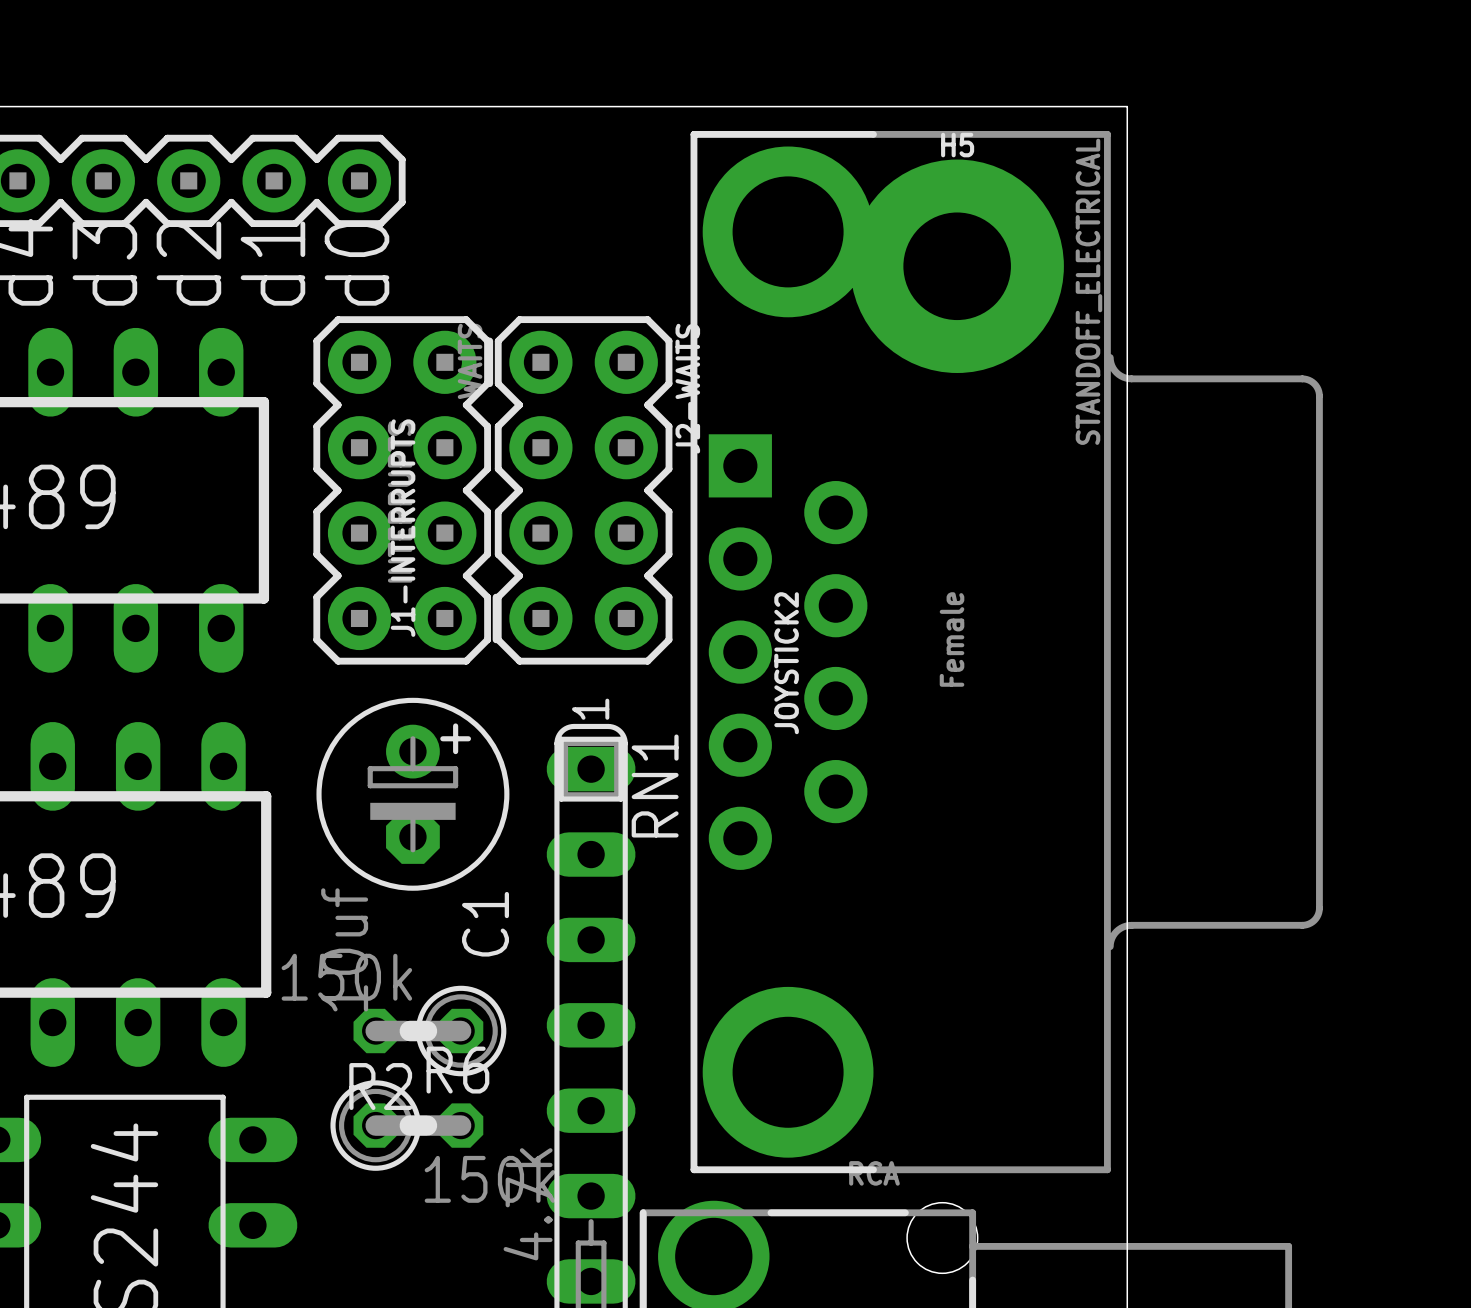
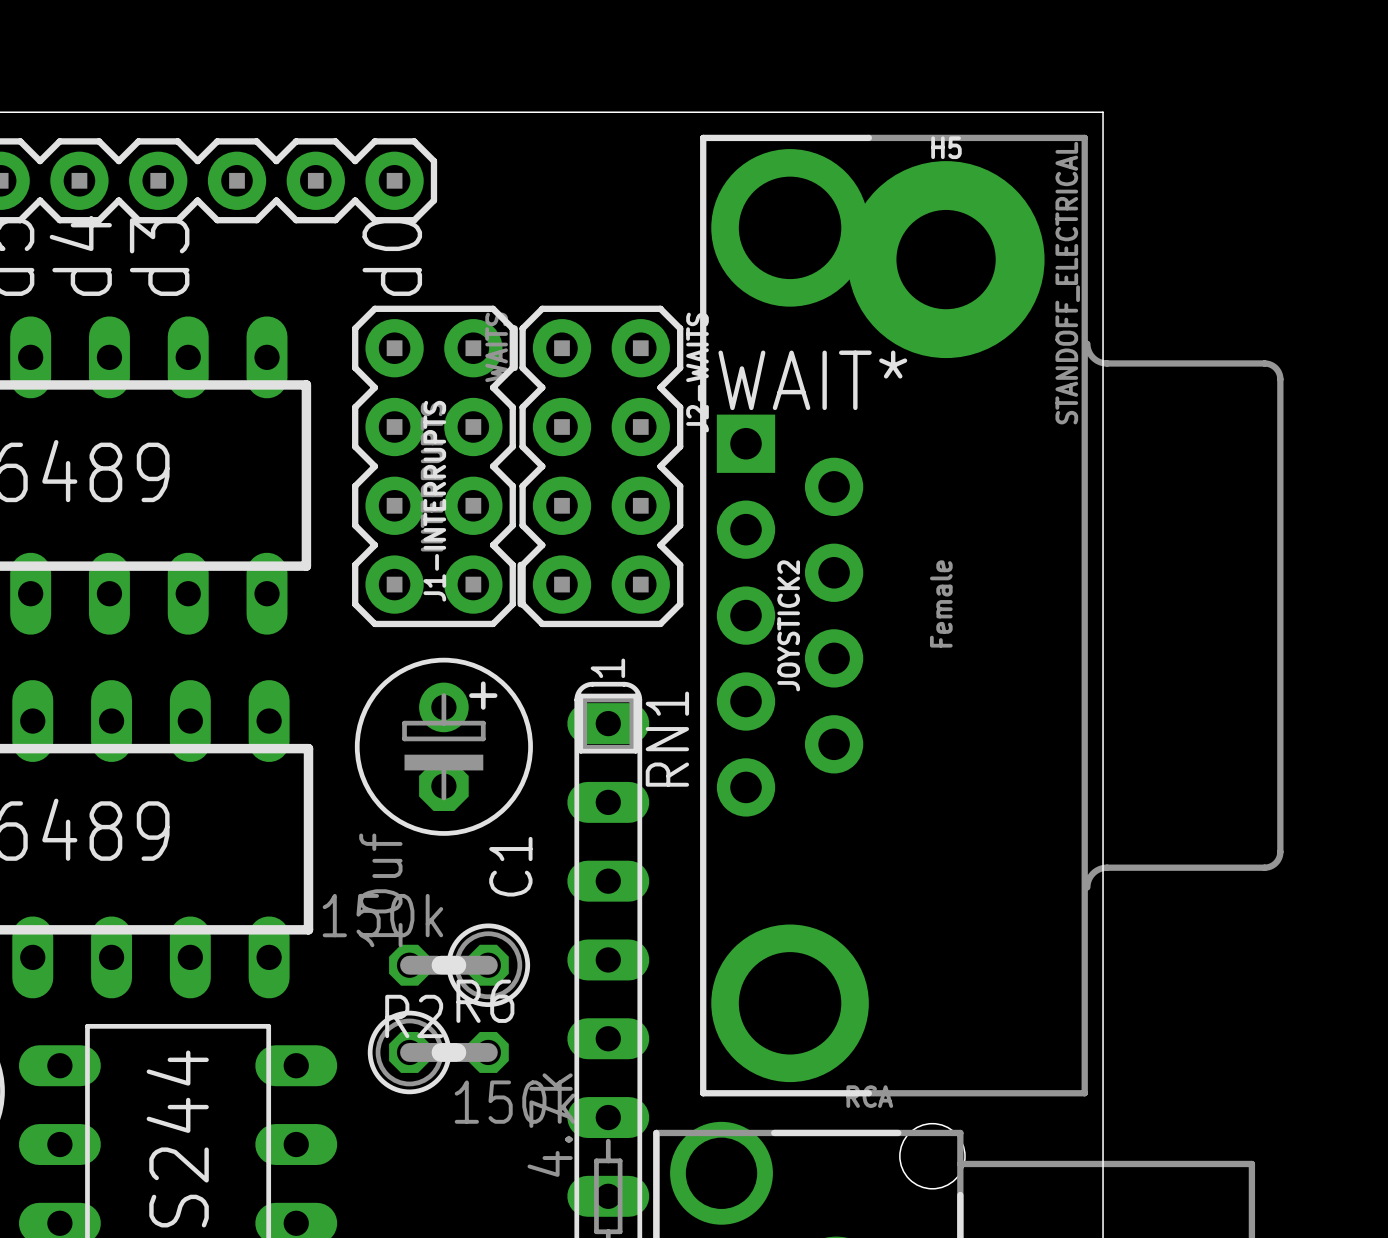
text: d2 (188, 263) -> none
text: d1 (272, 263) -> none
text: none -> WAIT* (812, 380)

